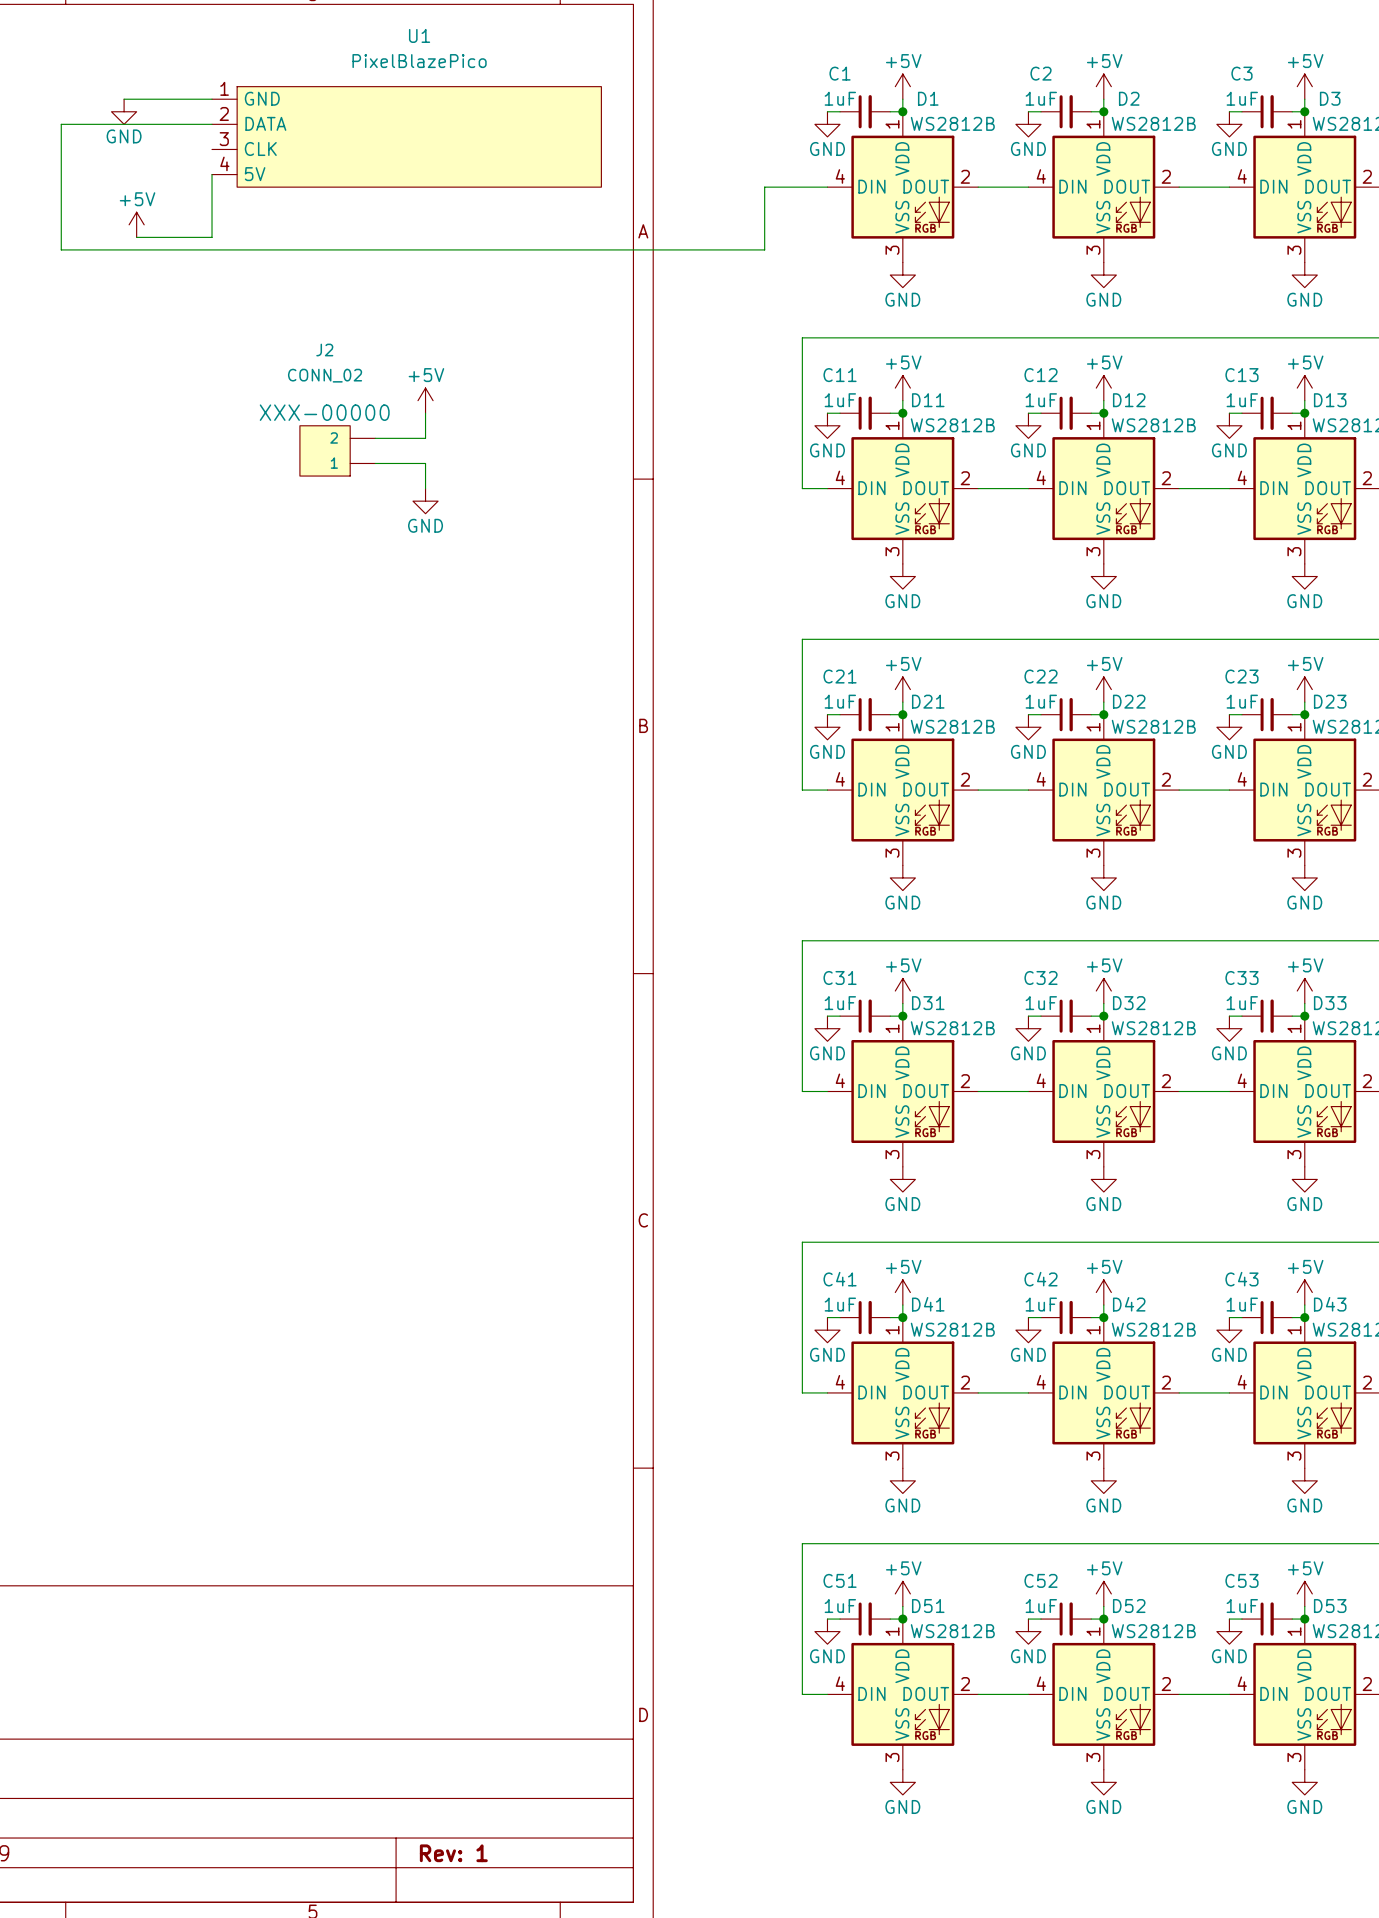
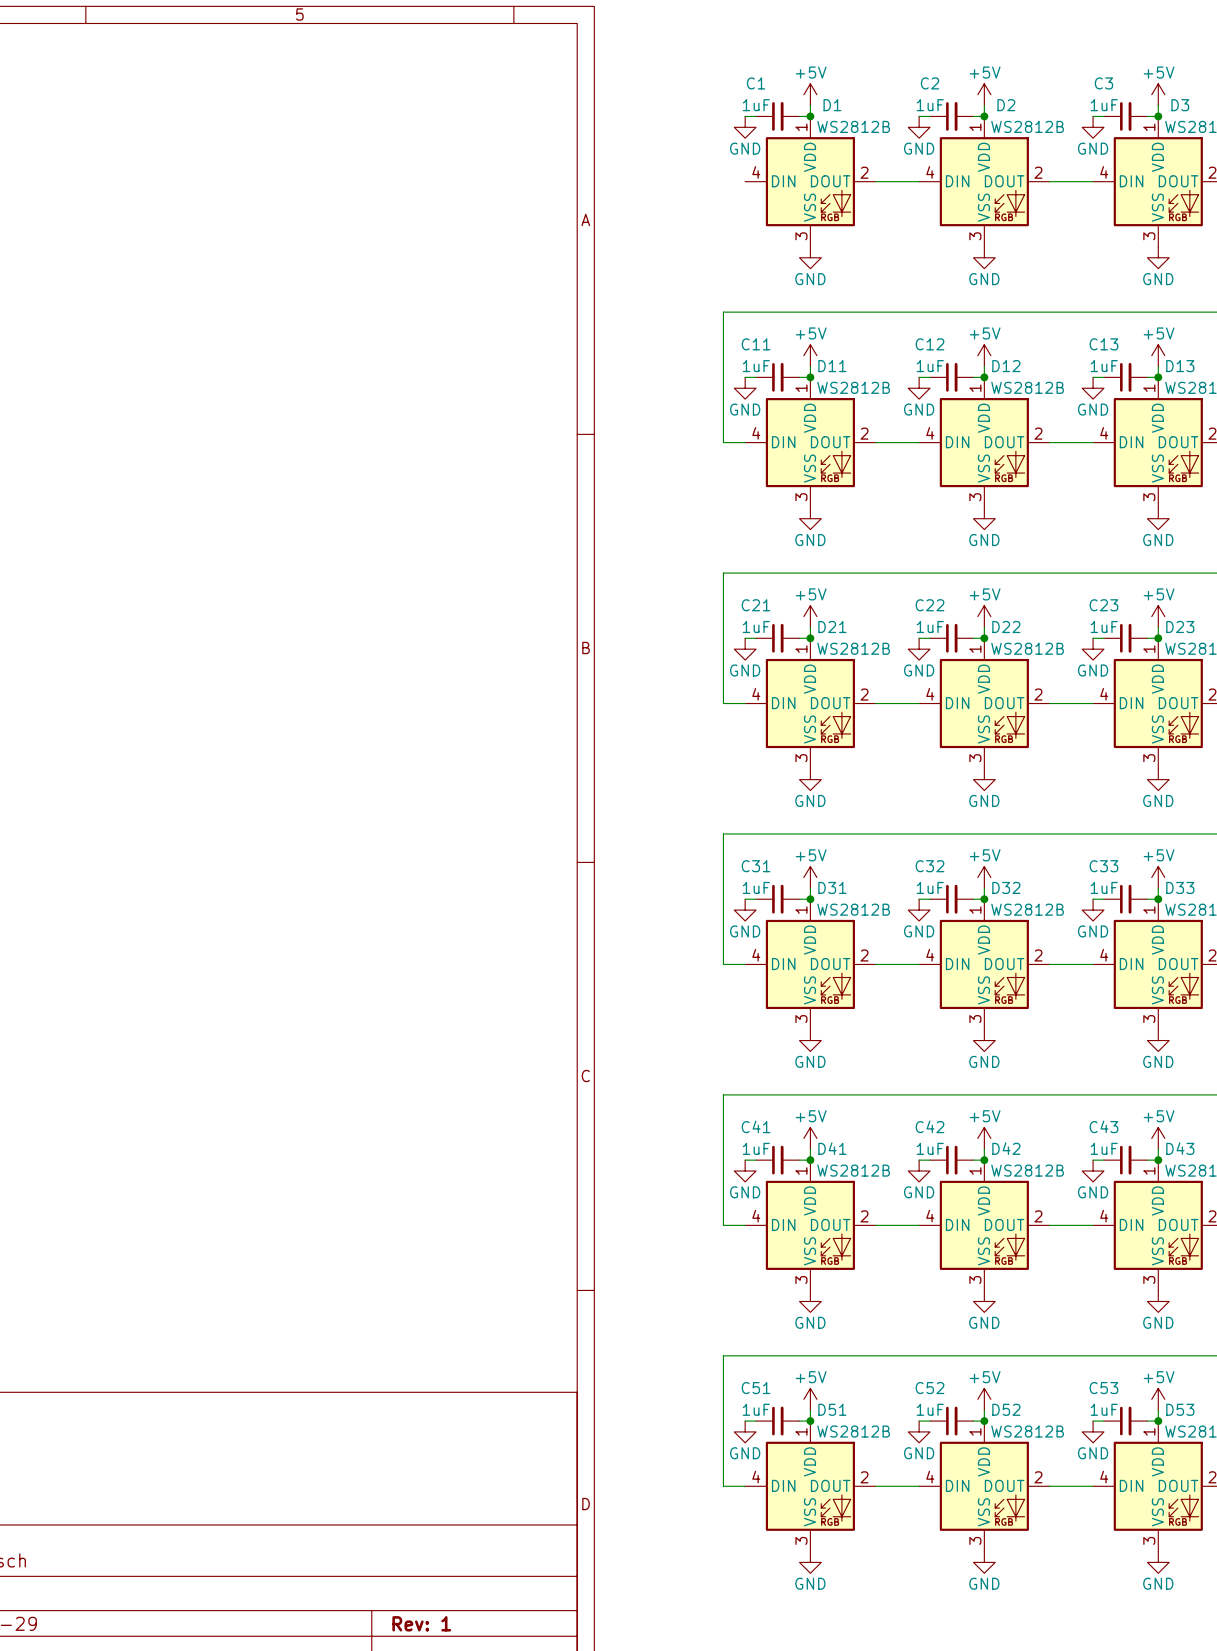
wire: (124, 99) (212, 99) -> none
power symbol: GND (124, 111) -> none
wire: (212, 124) (61, 124) (61, 249) (764, 249) (764, 187) (827, 187) -> none
U1: PixelBlazePico (406, 136) -> none
wire: (212, 174) (212, 237) (136, 237) -> none
power symbol: +5V (136, 224) -> none
power symbol: +5V (425, 400) -> none
wire: (425, 413) (425, 438) (375, 438) -> none
J2: CONN_02 (337, 450) -> none
wire: (375, 463) (425, 463) (425, 488) -> none
power symbol: GND (425, 501) -> none

